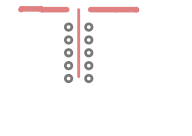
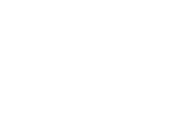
top track: (20, 9) (66, 9) -> none
top track: (78, 9) (78, 76) -> none
top track: (90, 9) (136, 9) -> none
via: (68, 27) -> none
via: (88, 27) -> none
via: (68, 39) -> none
via: (88, 39) -> none
via: (68, 52) -> none
via: (88, 52) -> none
via: (68, 65) -> none
via: (88, 65) -> none
via: (68, 78) -> none
via: (88, 78) -> none

